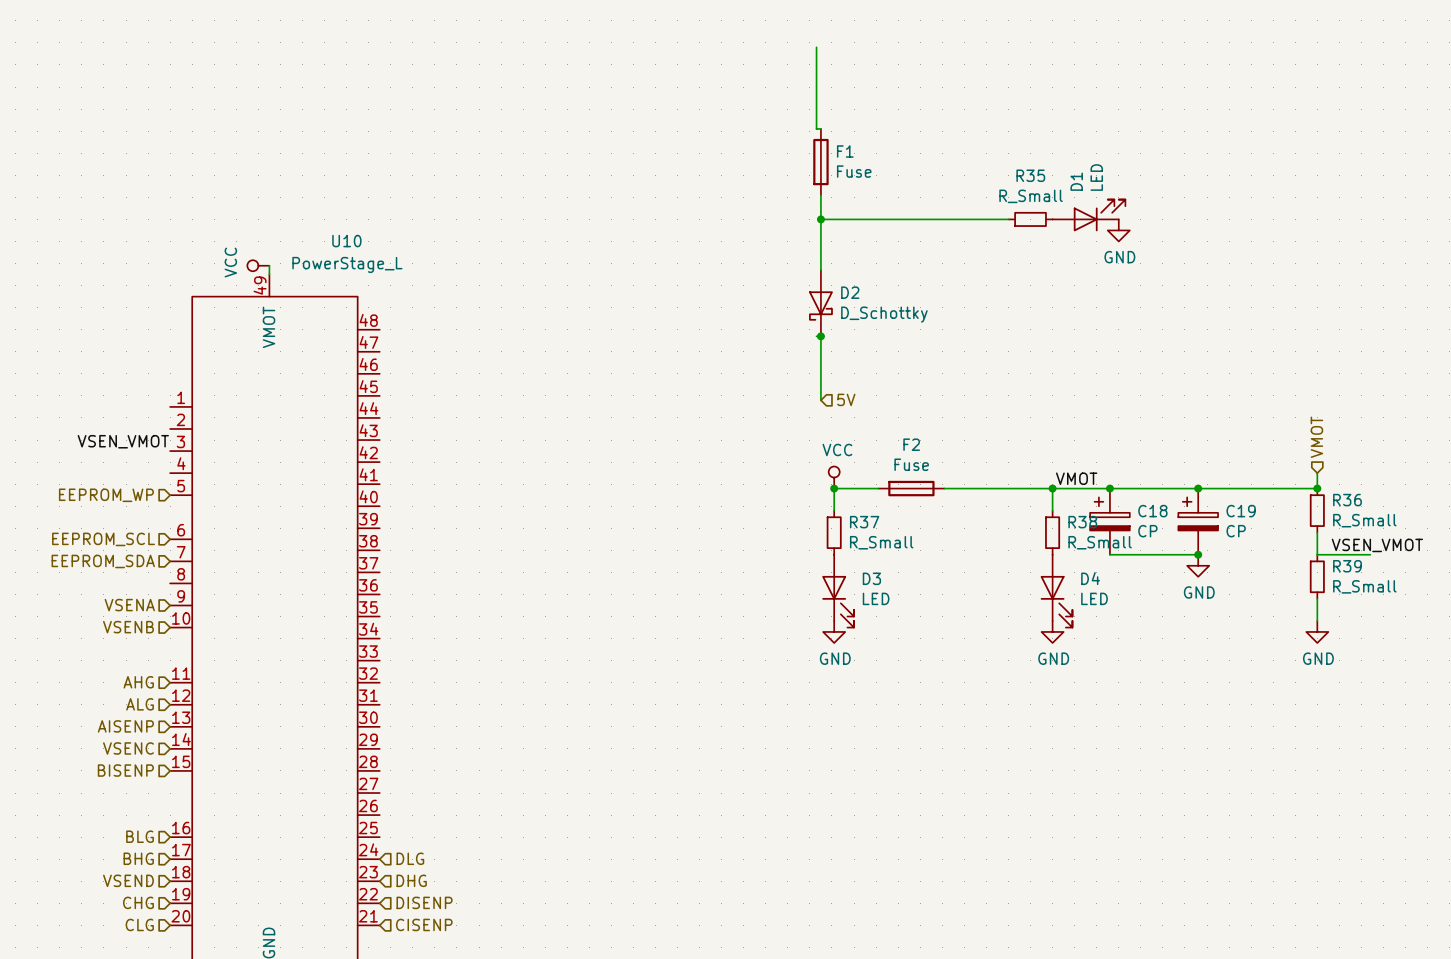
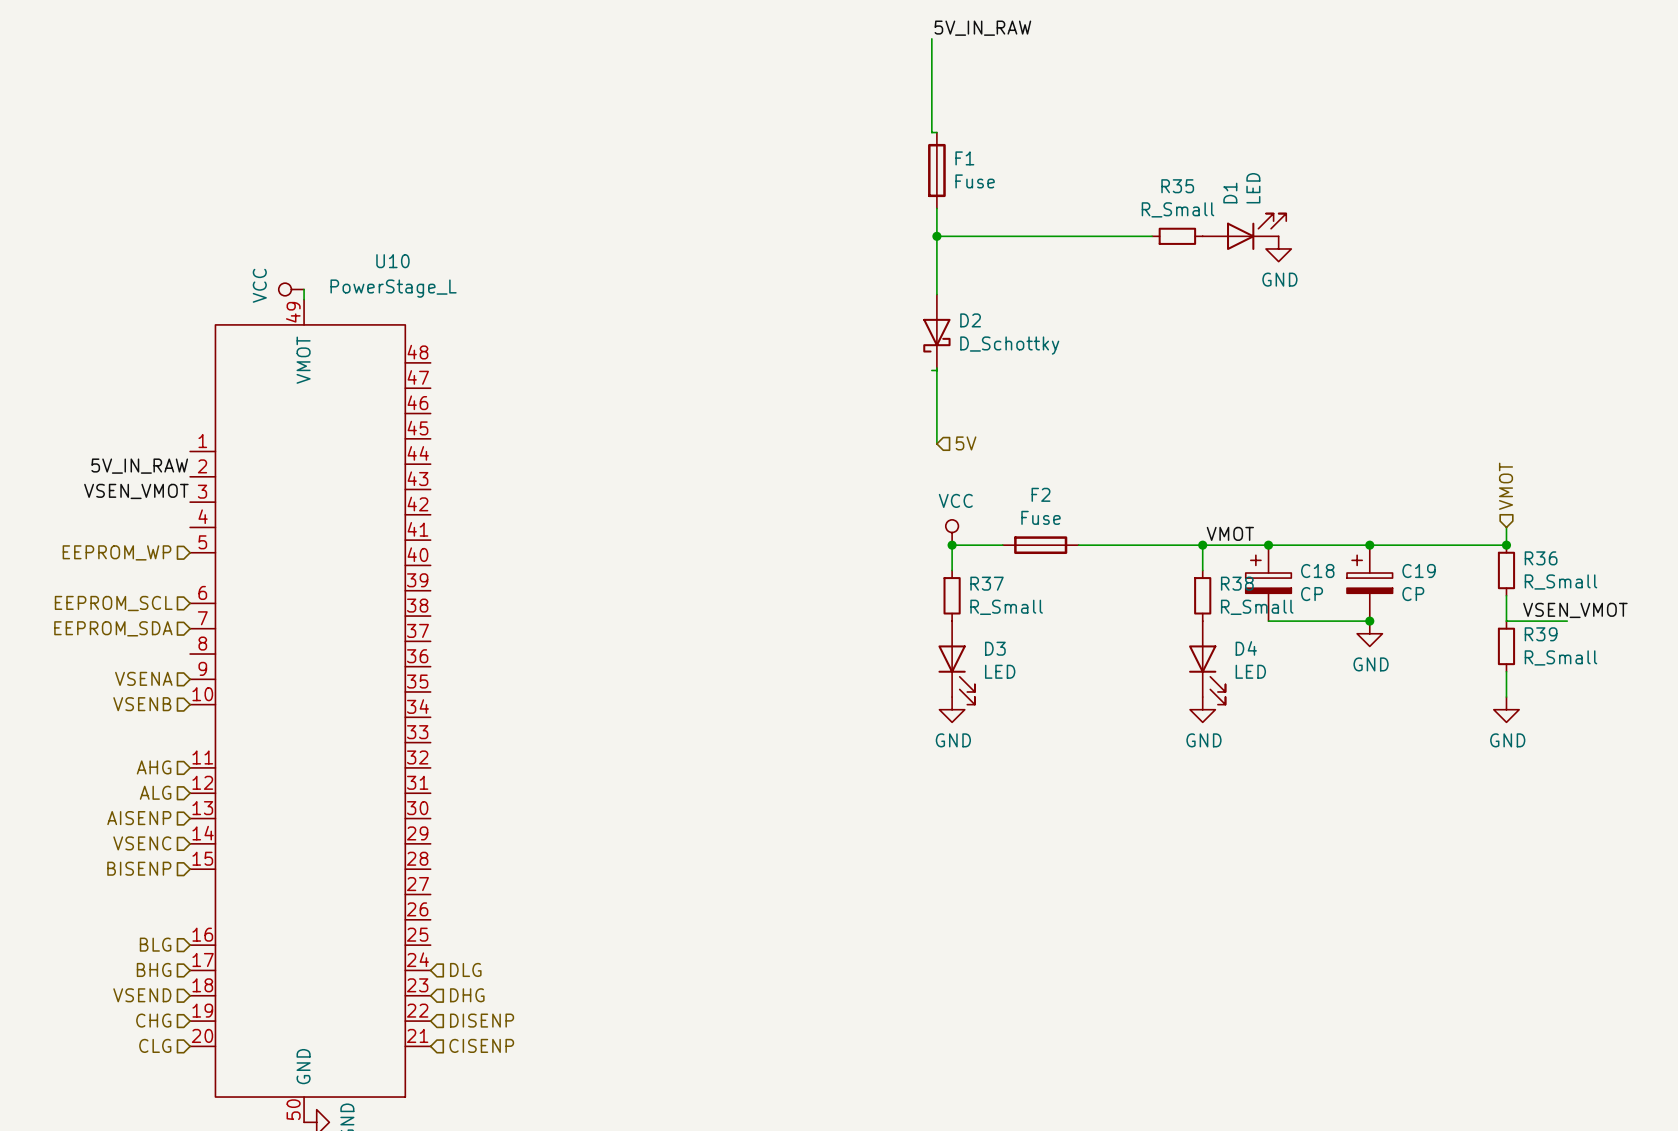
label: none -> 5V_IN_RAW (982, 28)
junction: (820, 336) -> none
label: none -> 5V_IN_RAW (139, 466)

